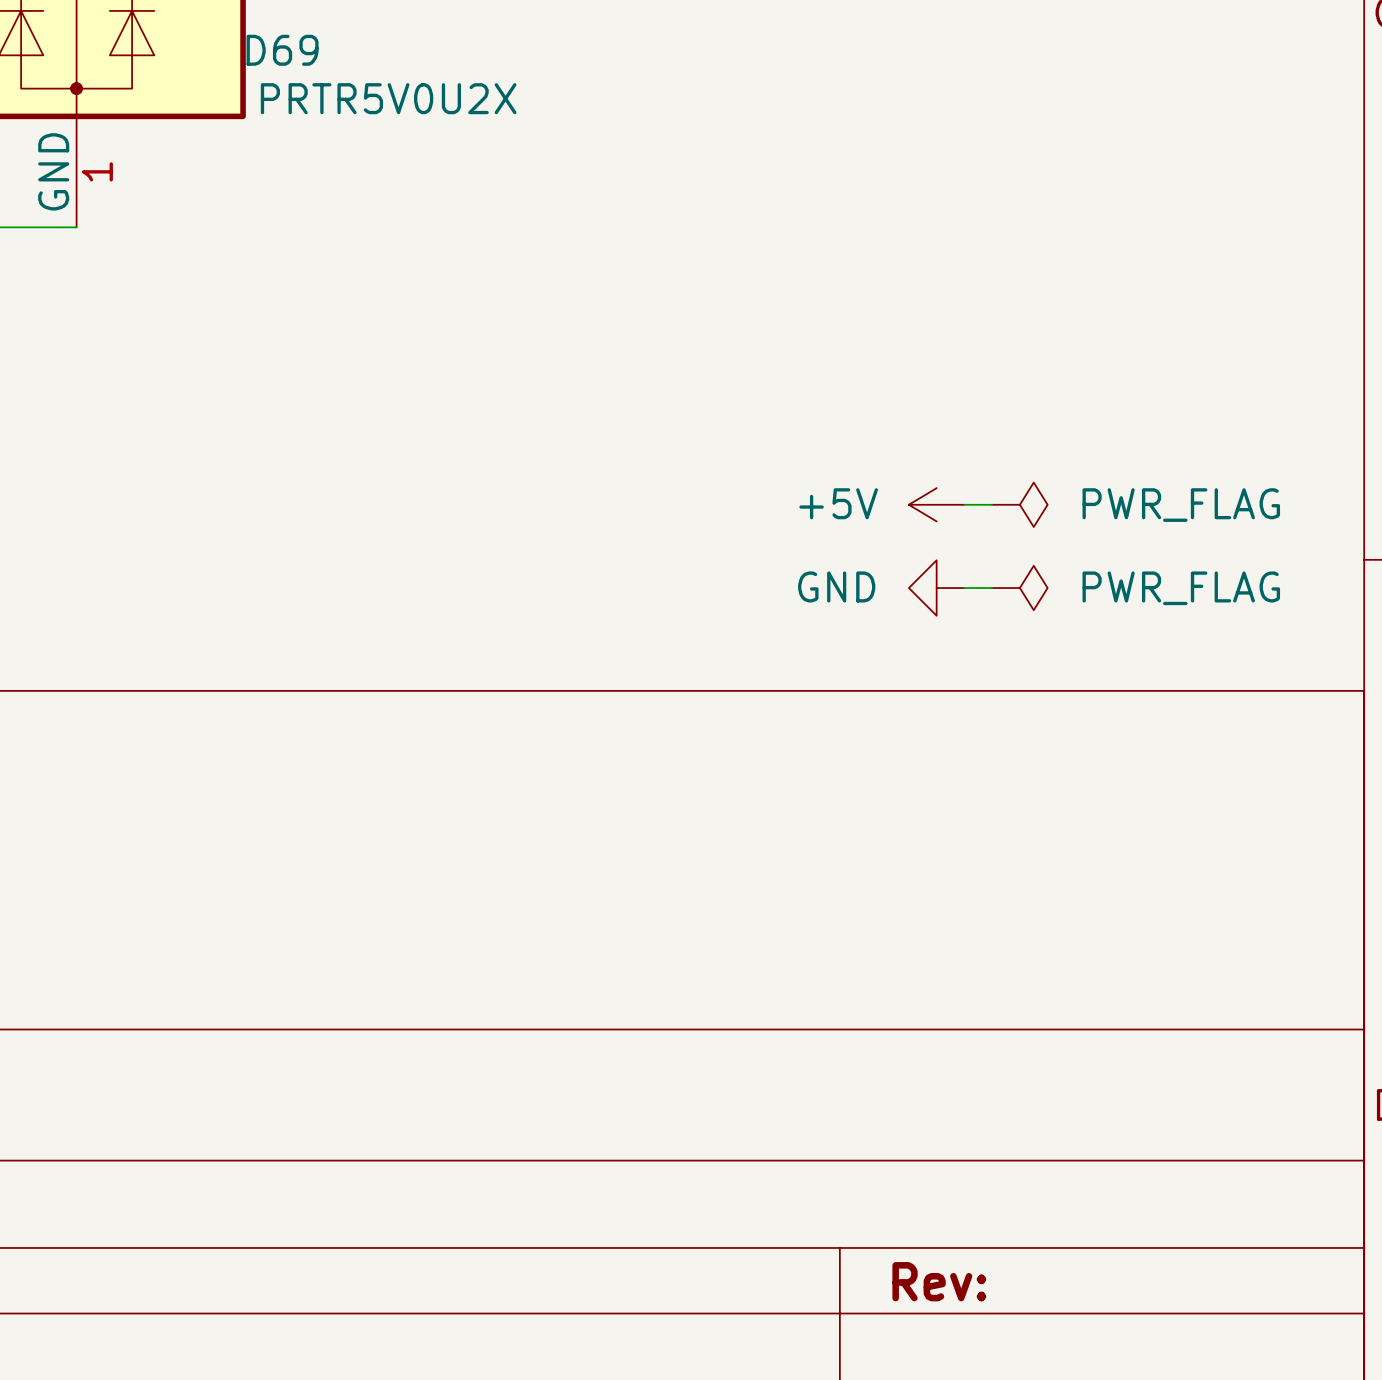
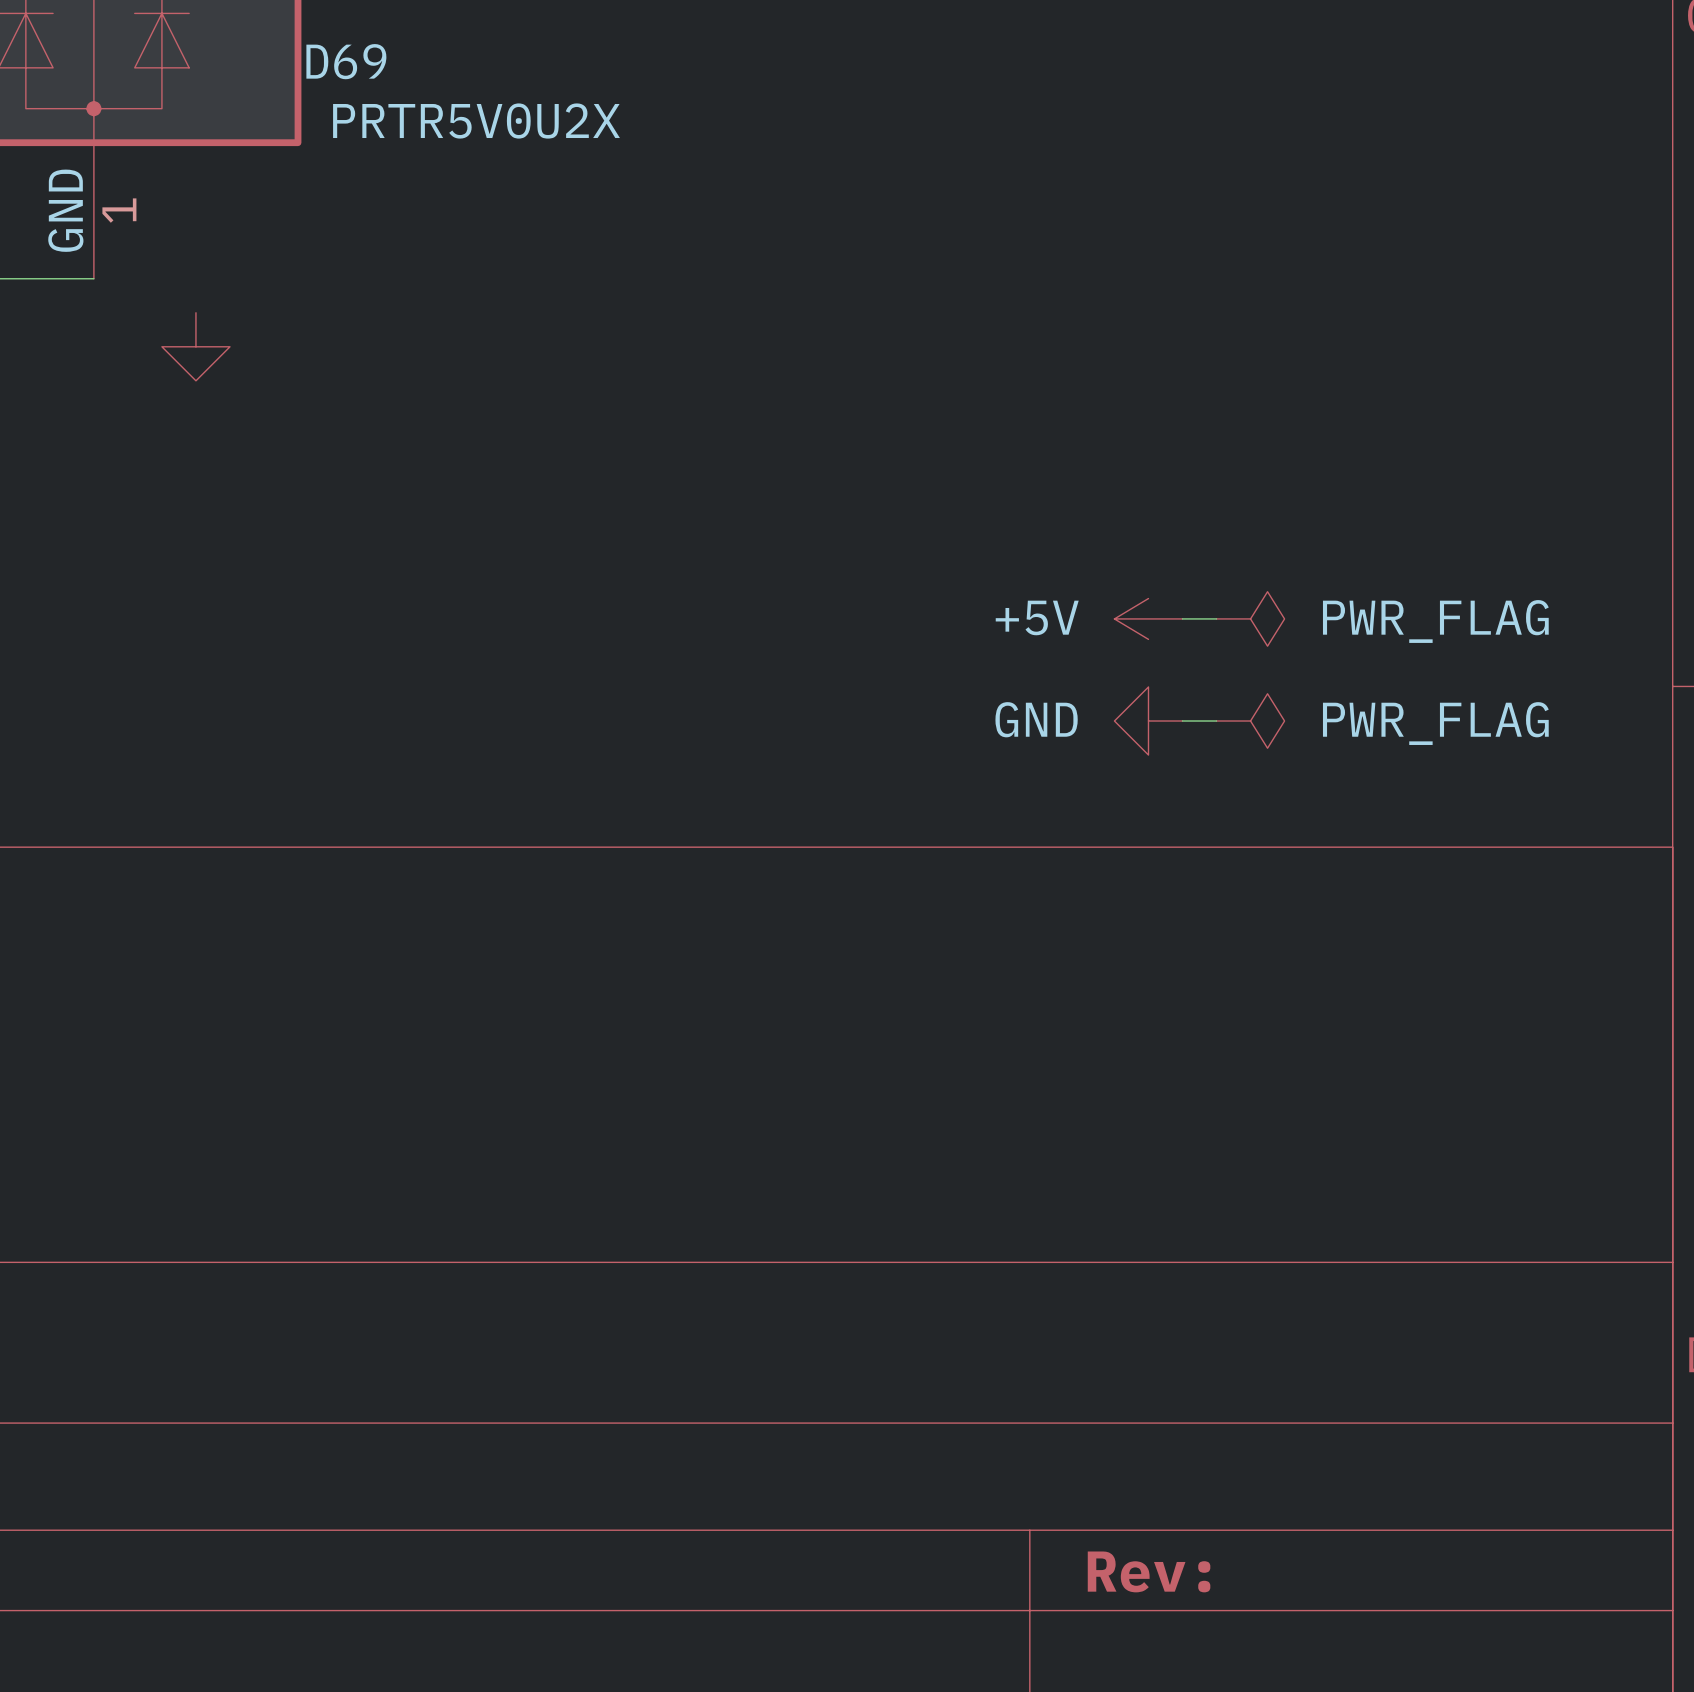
power symbol: none -> (195, 346)

